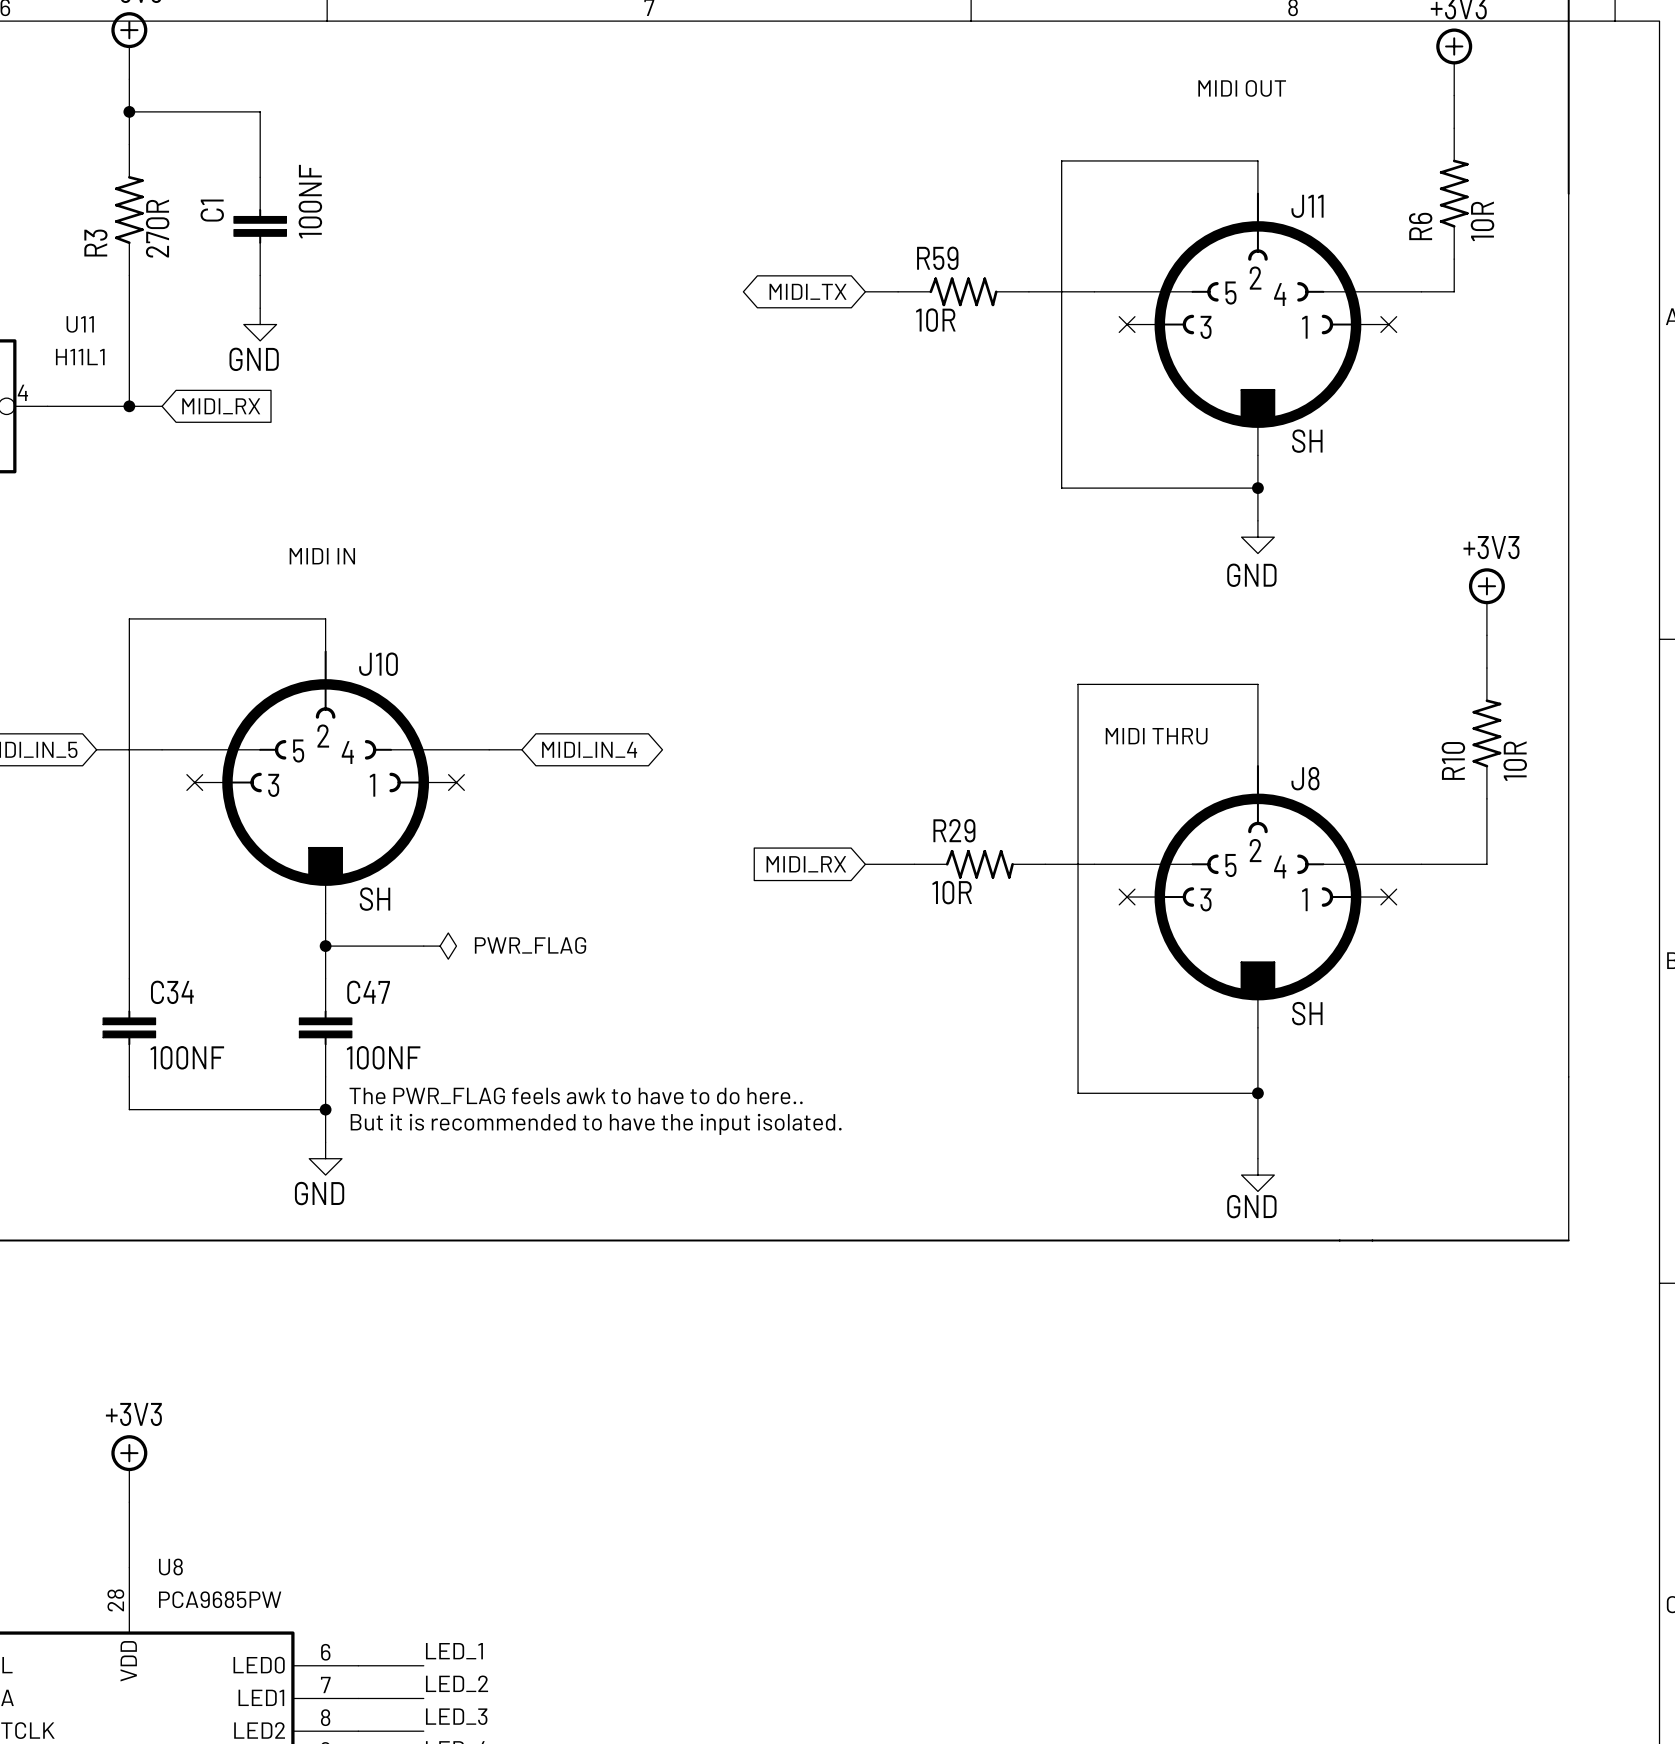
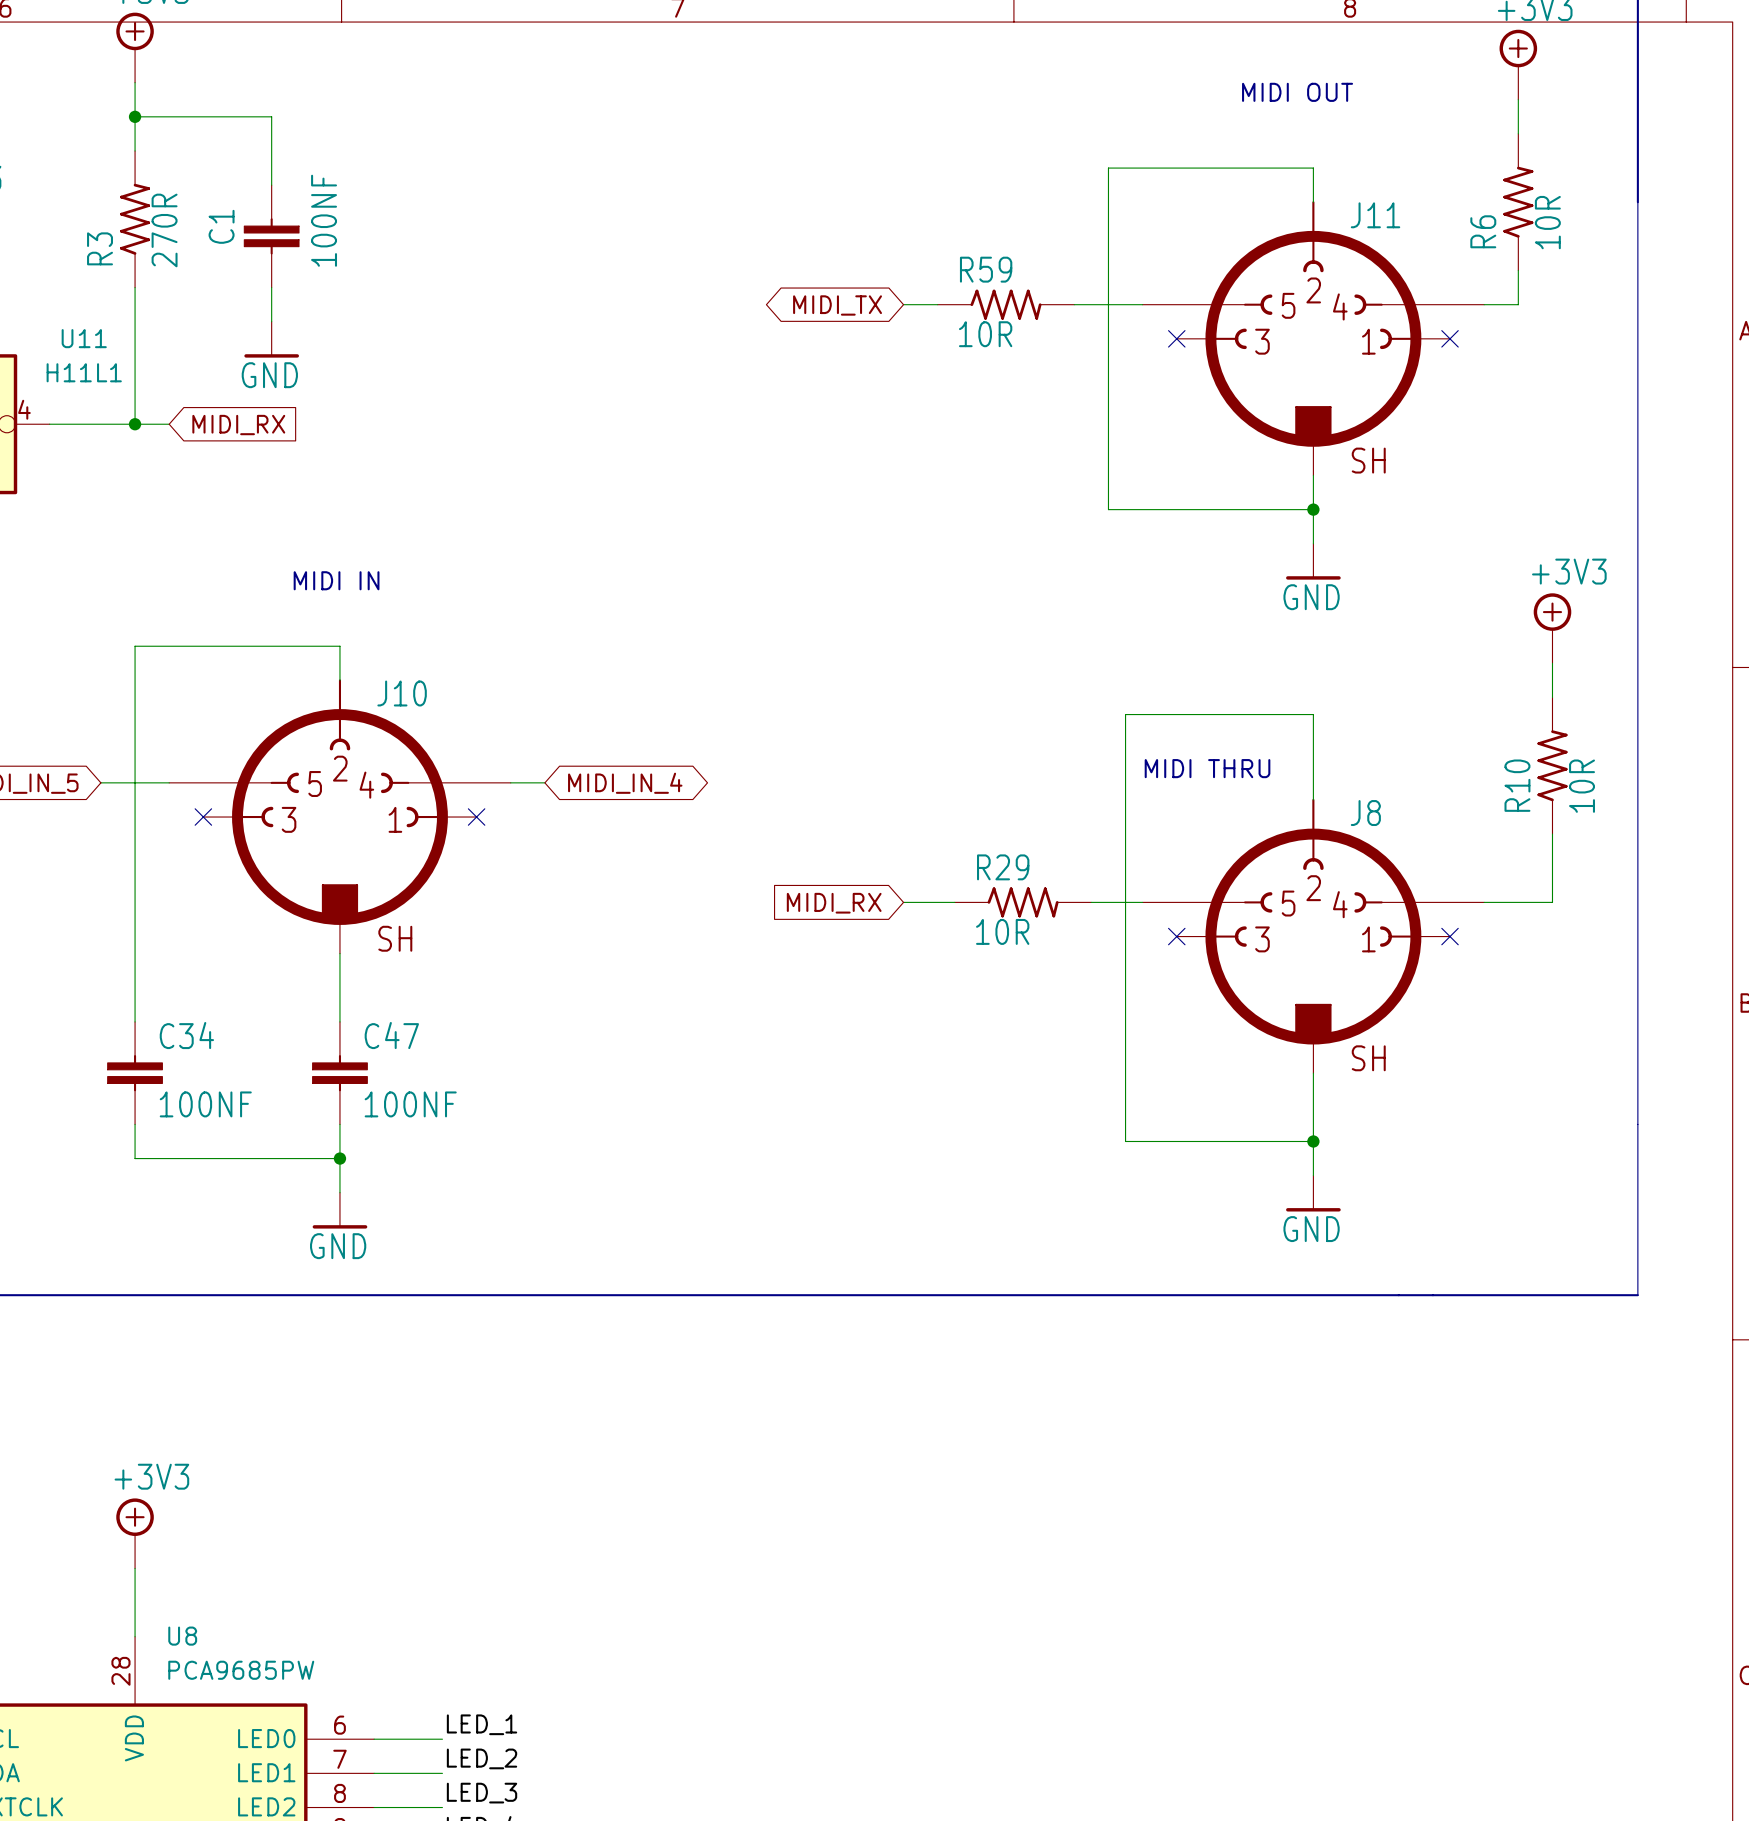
power symbol shape: [243, 308, 277, 341] -> [244, 321, 299, 358]
power symbol shape: [1241, 520, 1275, 554] -> [1286, 543, 1341, 580]
wire: (325, 946) (423, 946) -> none
junction: (325, 946) -> none
power symbol: PWR_FLAG (440, 946) -> none
text: The PWR_FLAG feels awk to have to do here.. (576, 1095) -> none
text: But it is recommended to have the input isolated. (596, 1124) -> none
power symbol shape: [309, 1142, 342, 1176] -> [312, 1192, 368, 1229]
power symbol: none -> GND (1313, 1193)
power symbol: GND (1257, 1175) -> none

